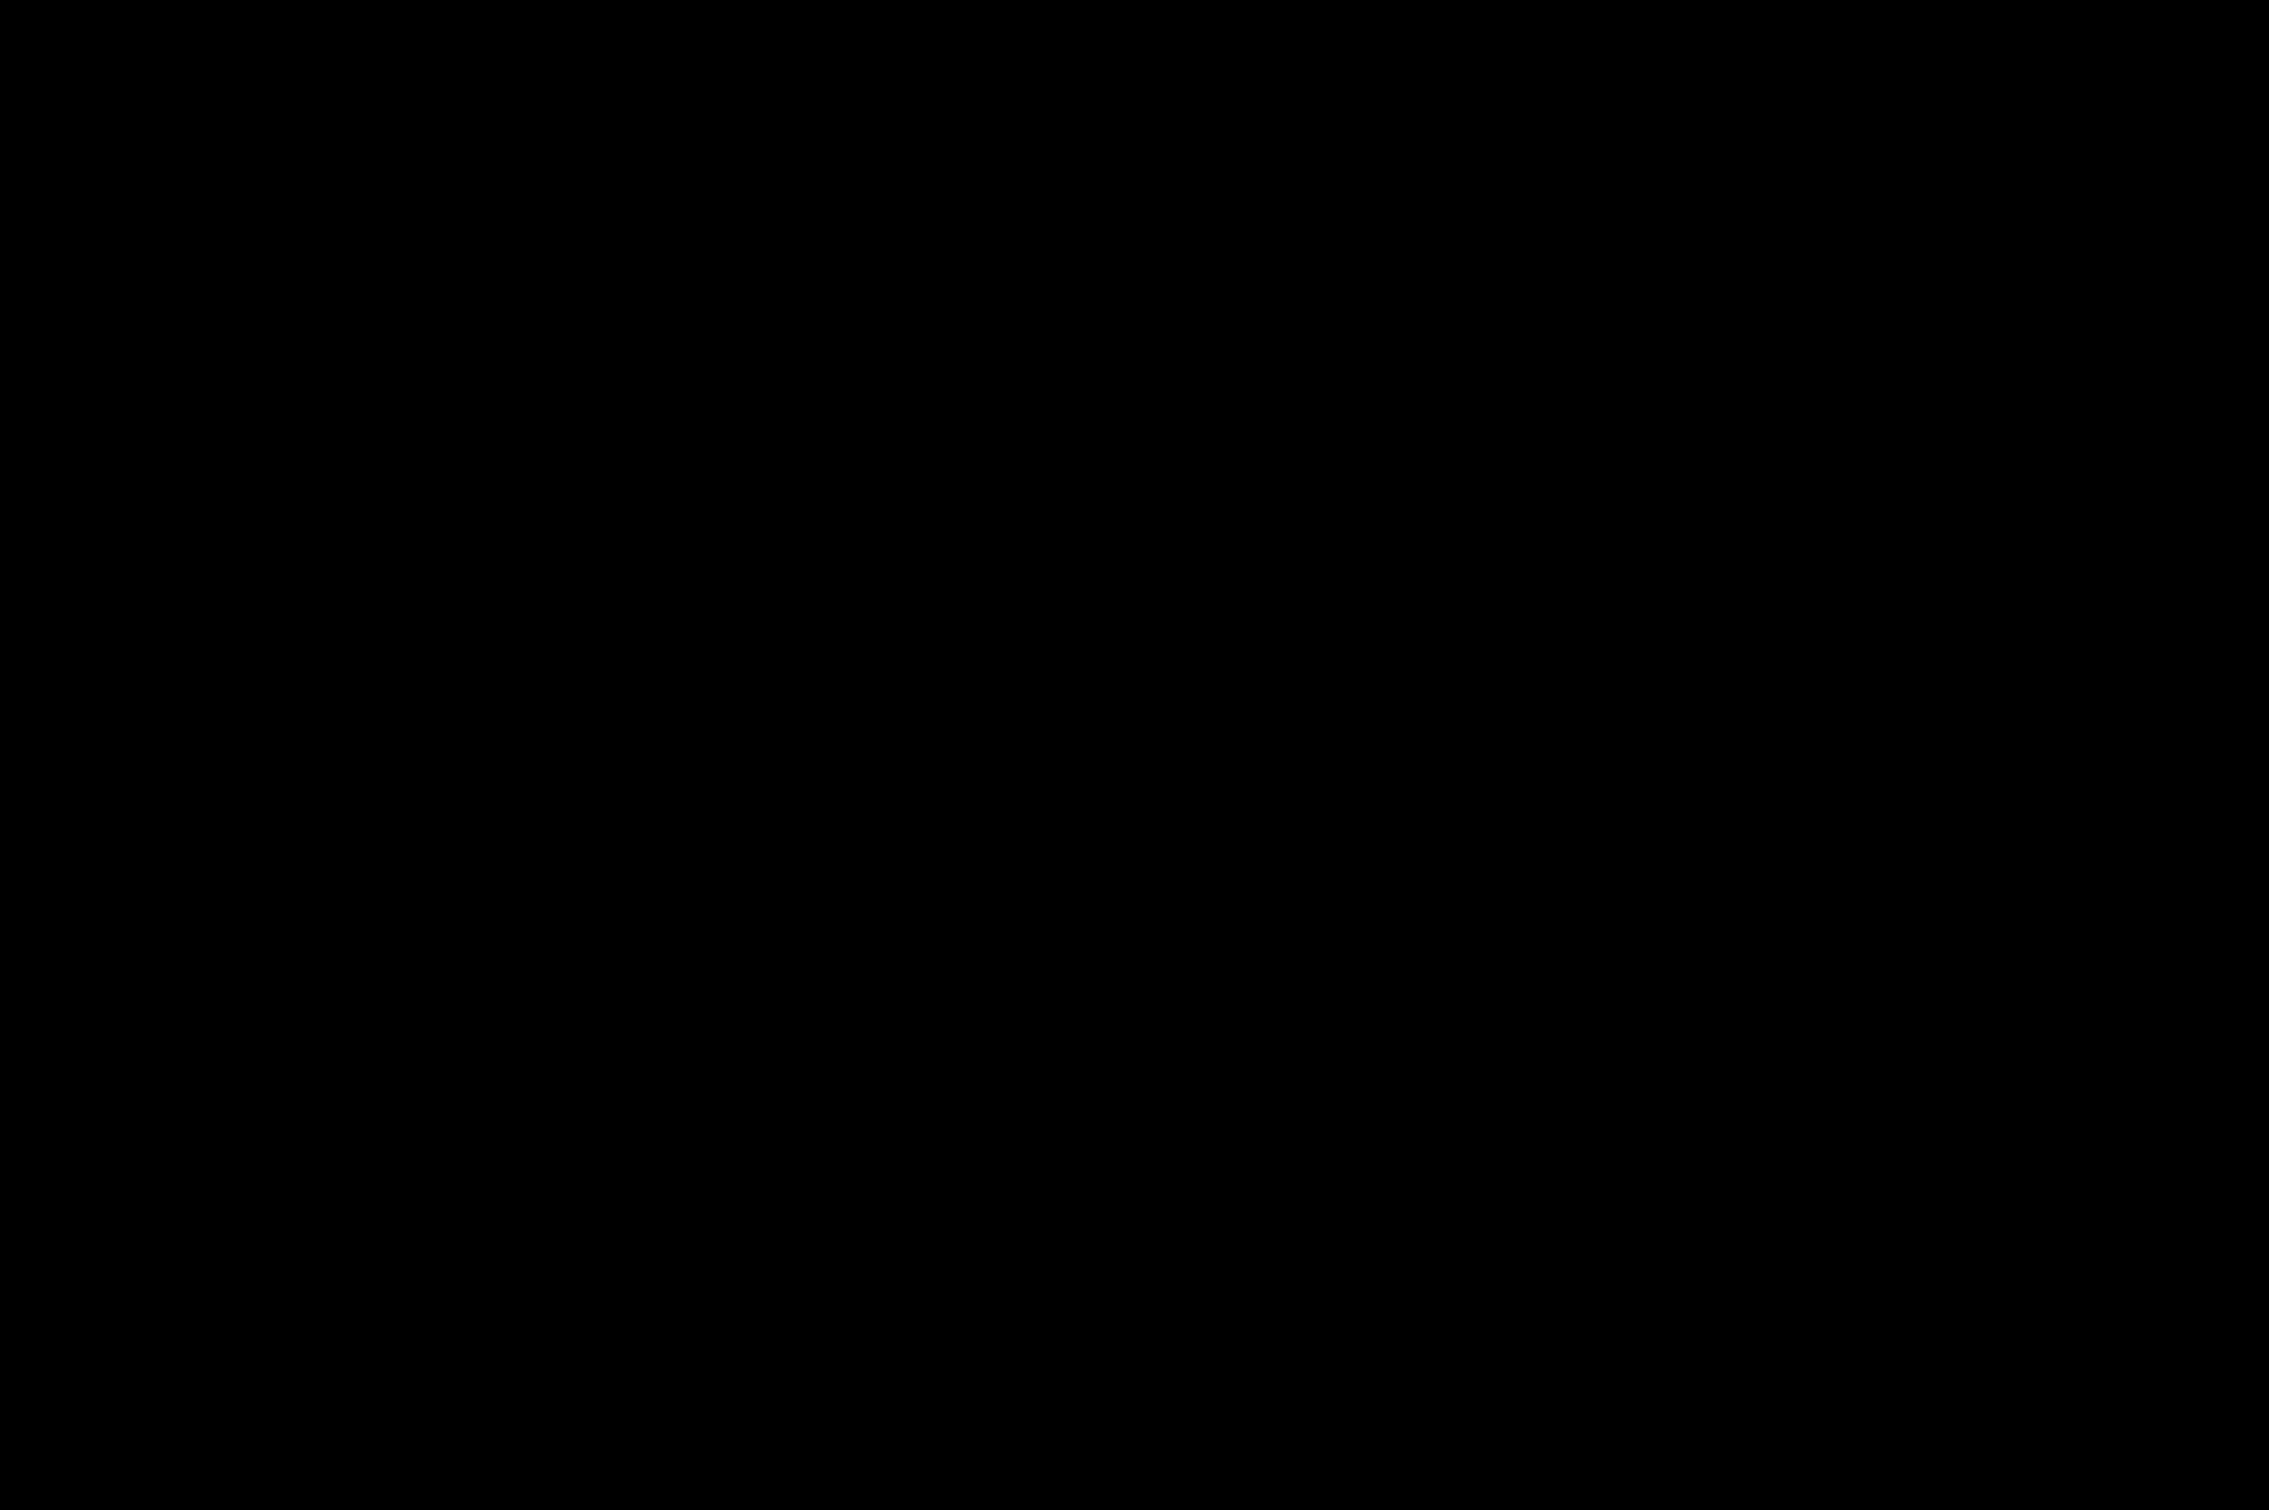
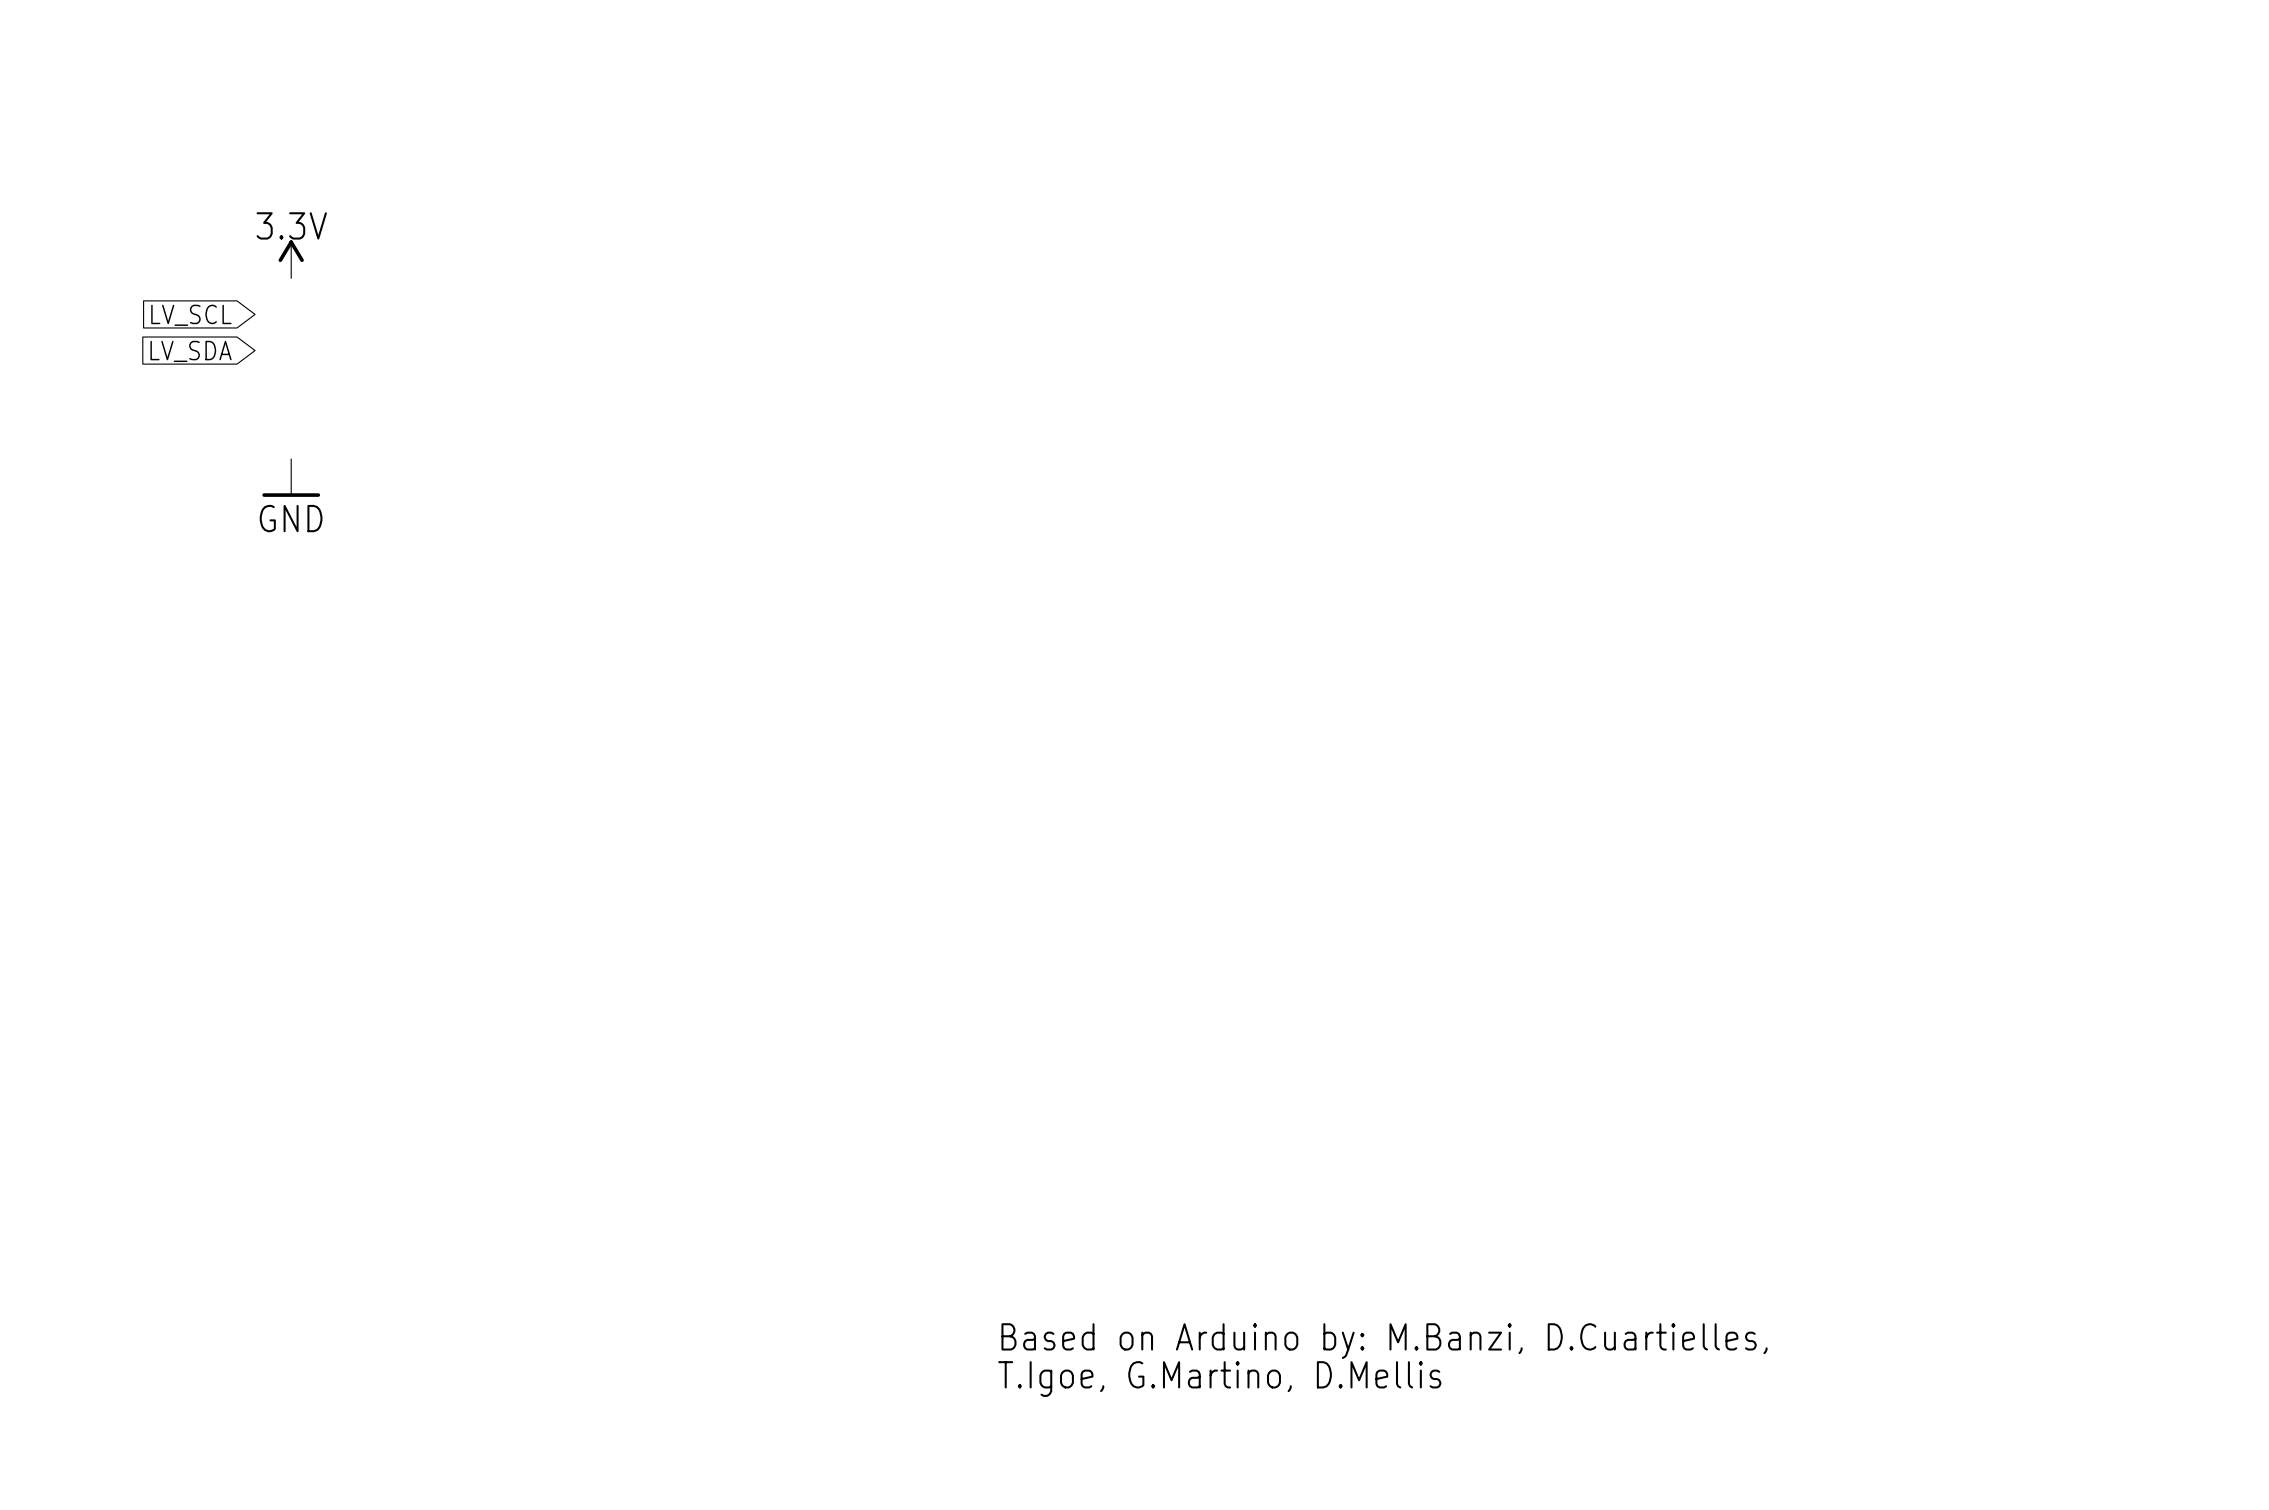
power symbol: none -> 3.3V (291, 259)
global label: none -> LV_SCL (191, 315)
global label: none -> LV_SDA (191, 351)
power symbol: none -> GND (291, 477)
text: none -> Based on Arduino by: M.Banzi, D.Cuartielles, (1384, 1341)
text: none -> T.Igoe, G.Martino, D.Mellis (1219, 1379)

